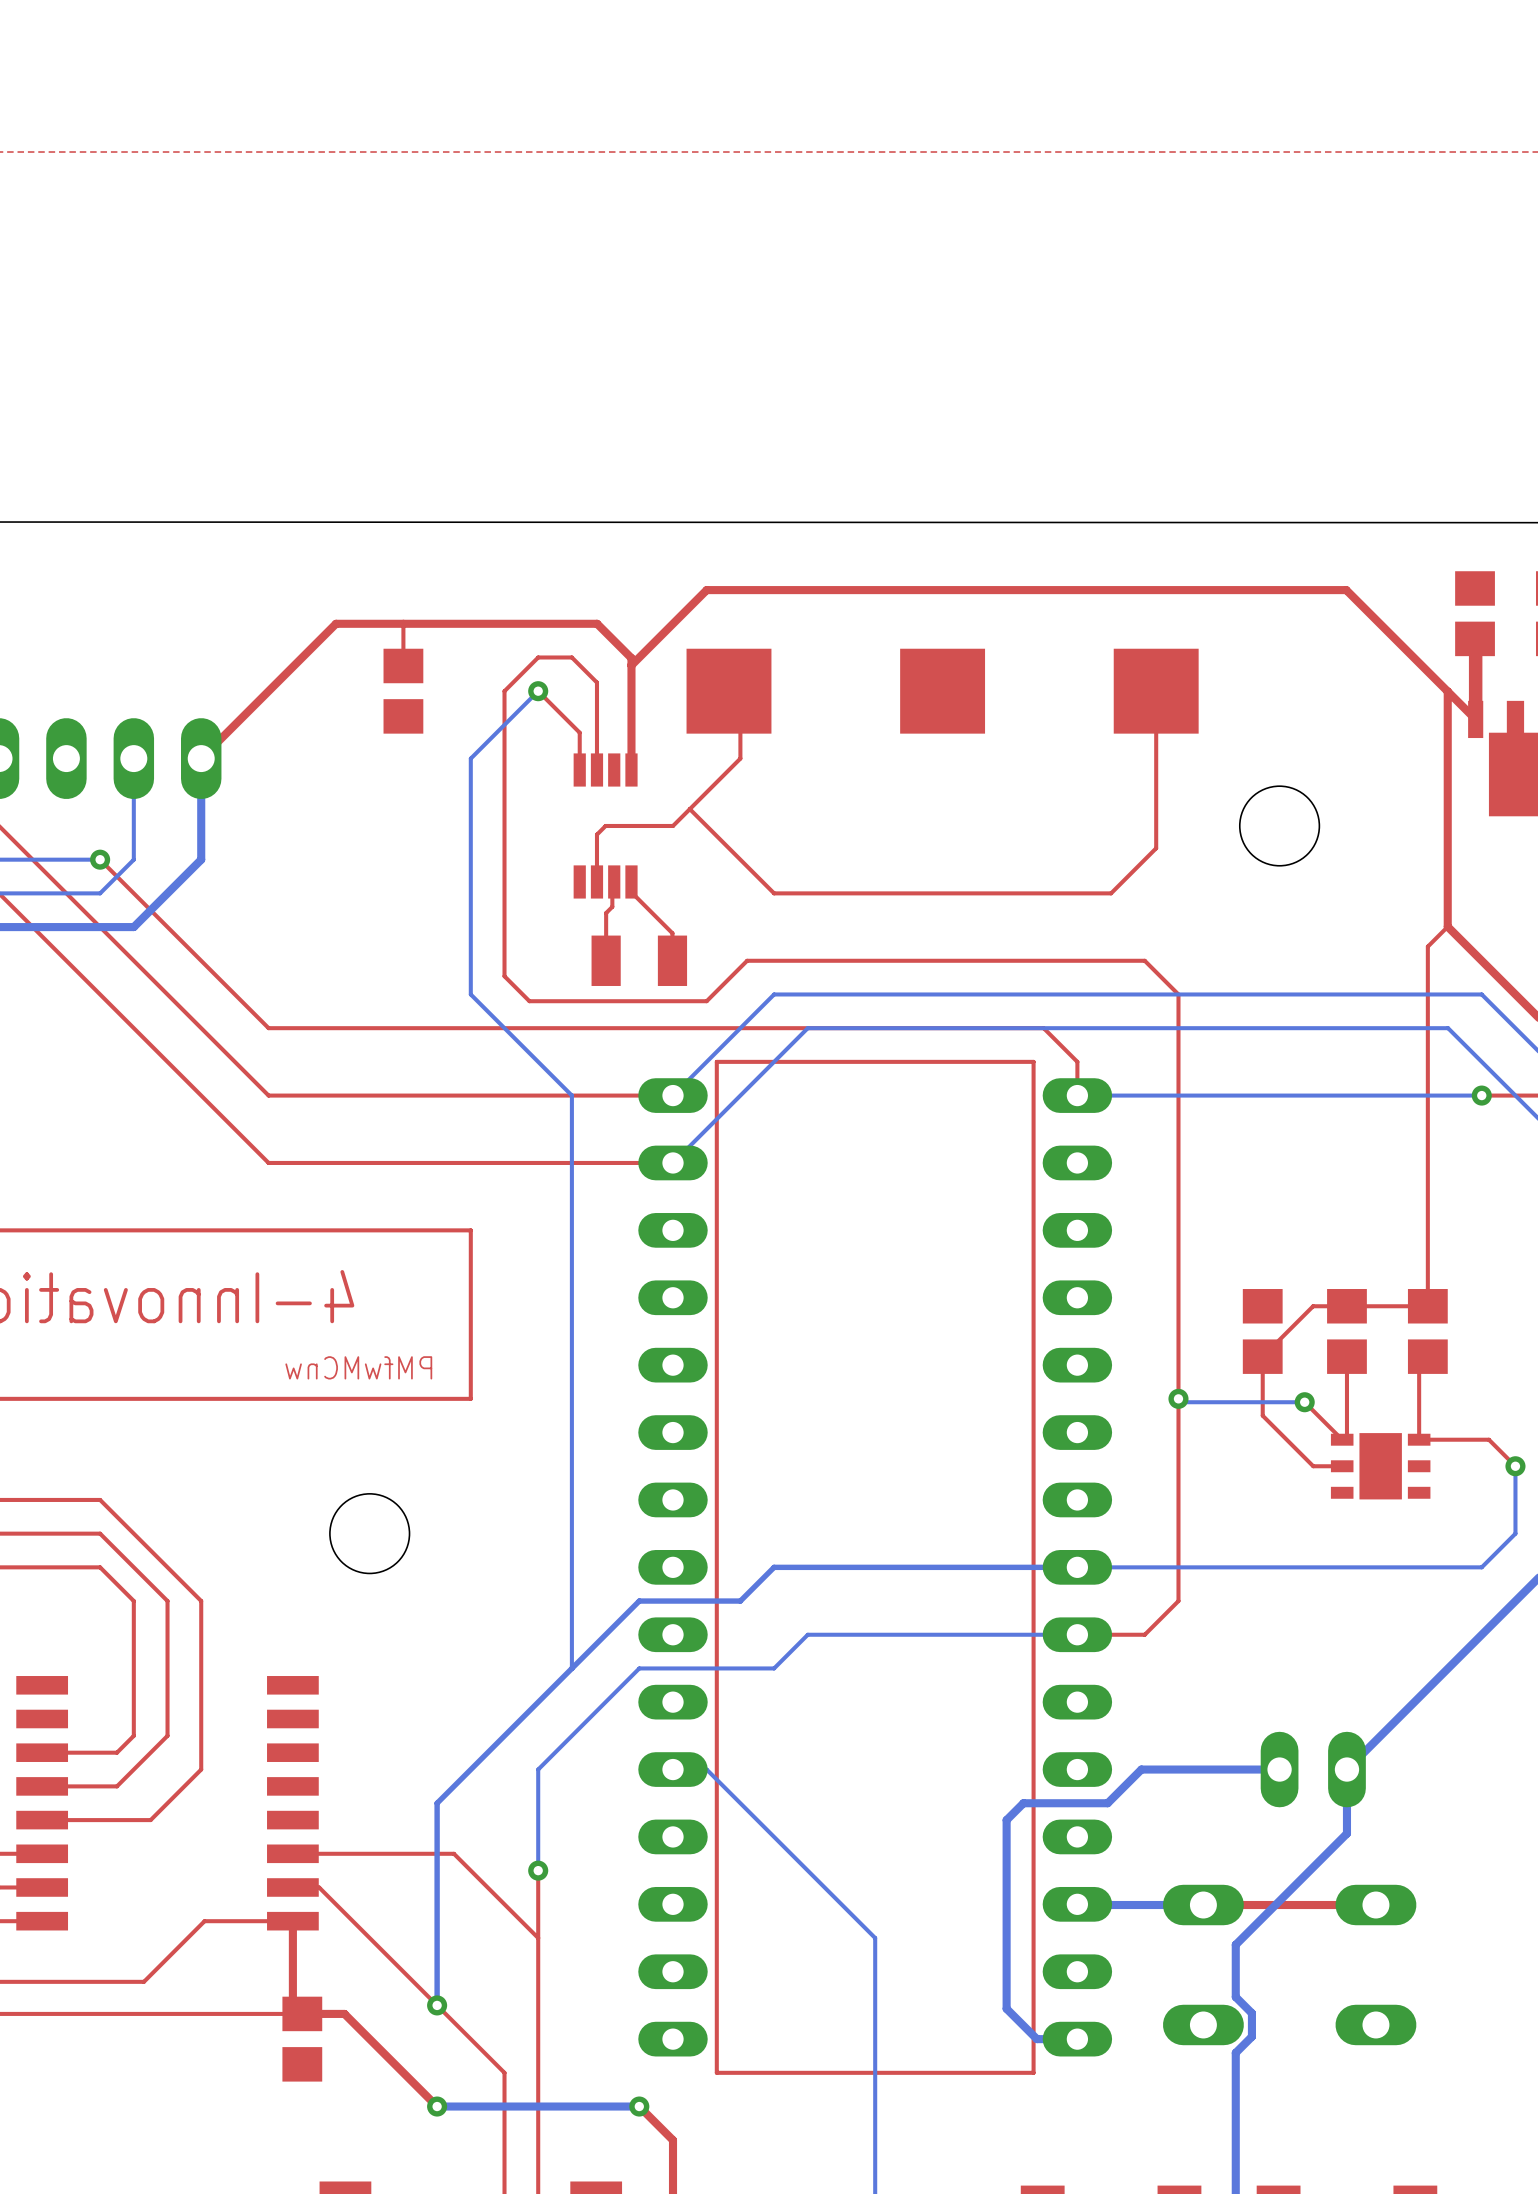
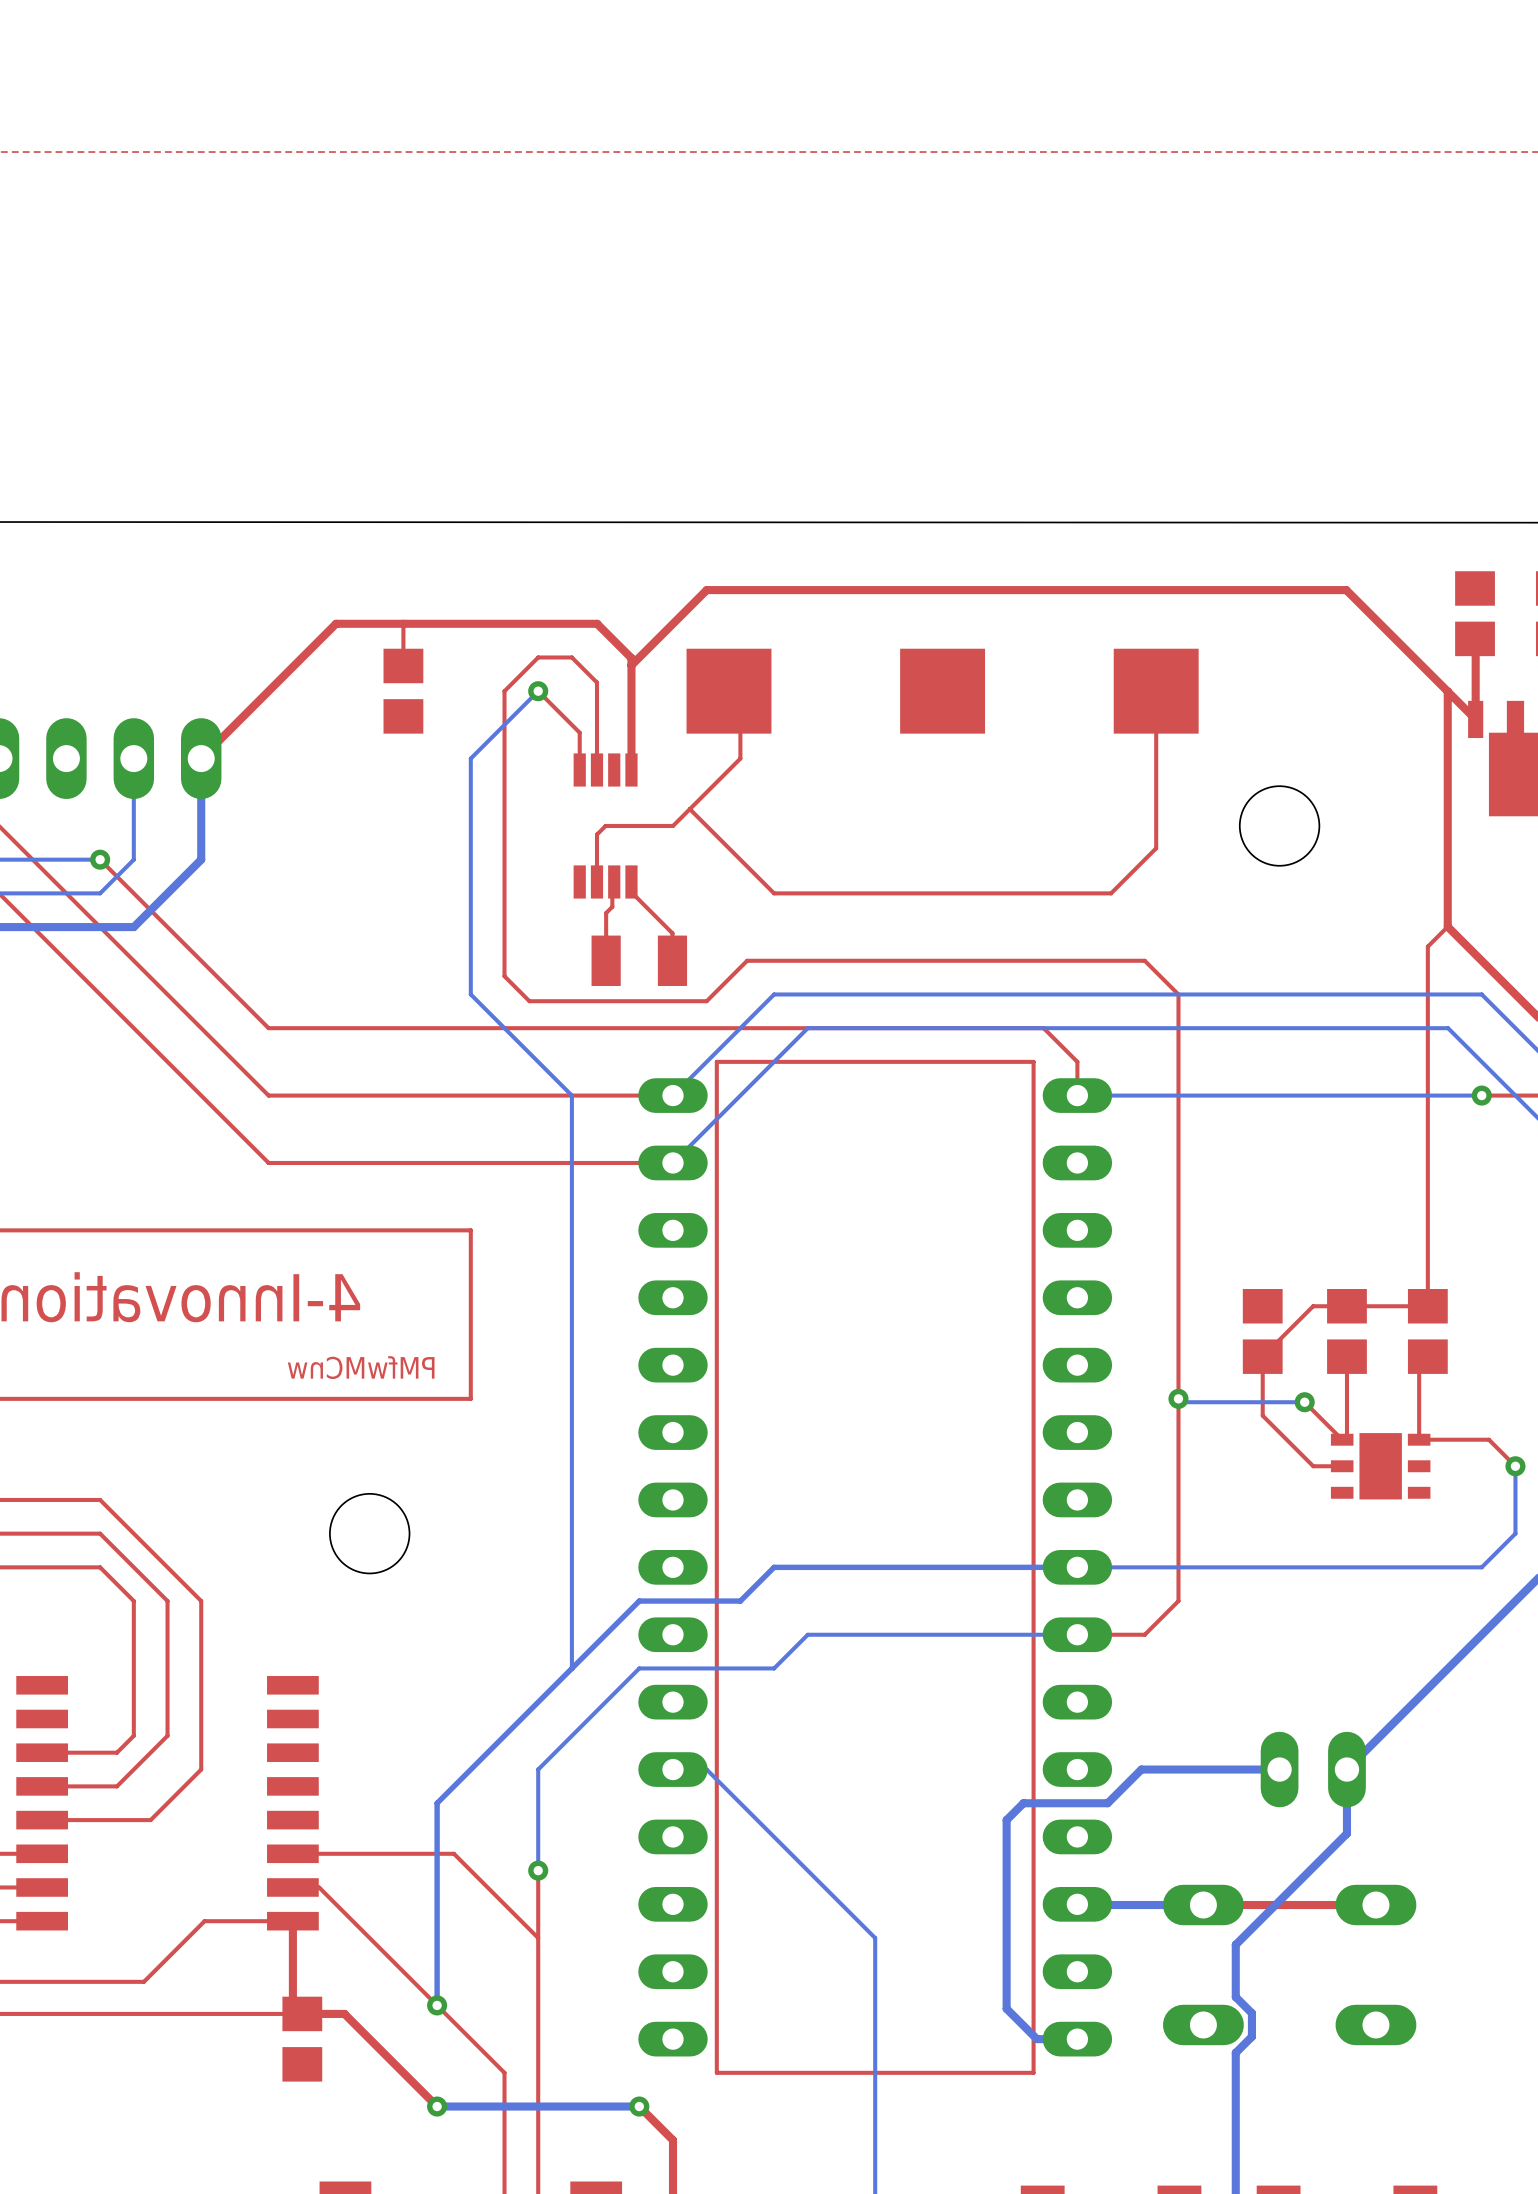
top track width: thick (1475, 649) (1475, 719) -> thin (1475, 649) (1475, 719)

